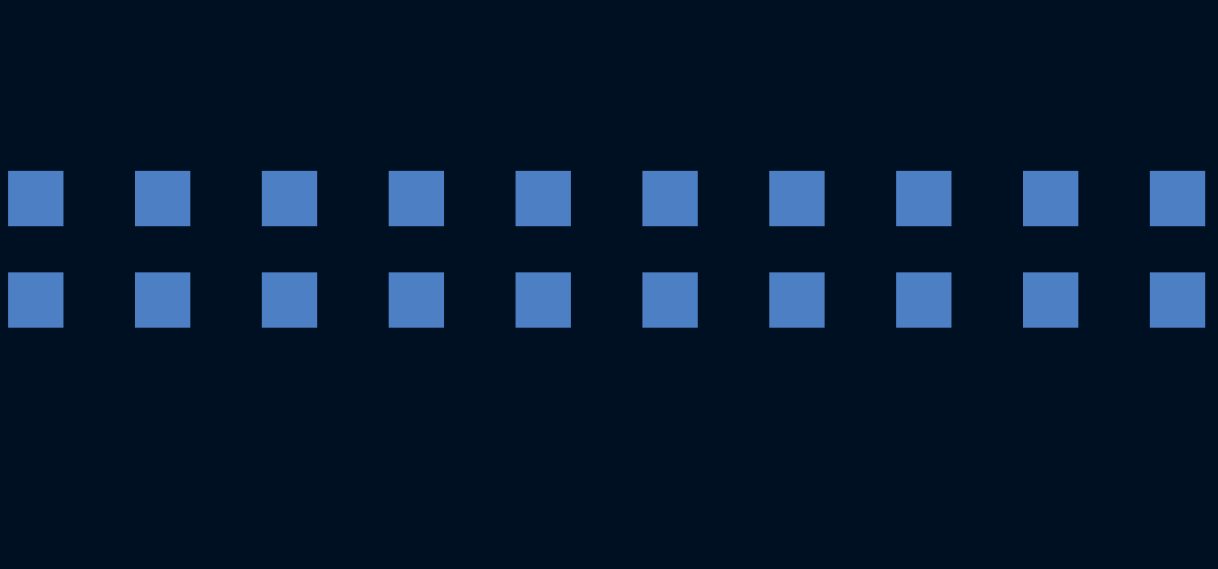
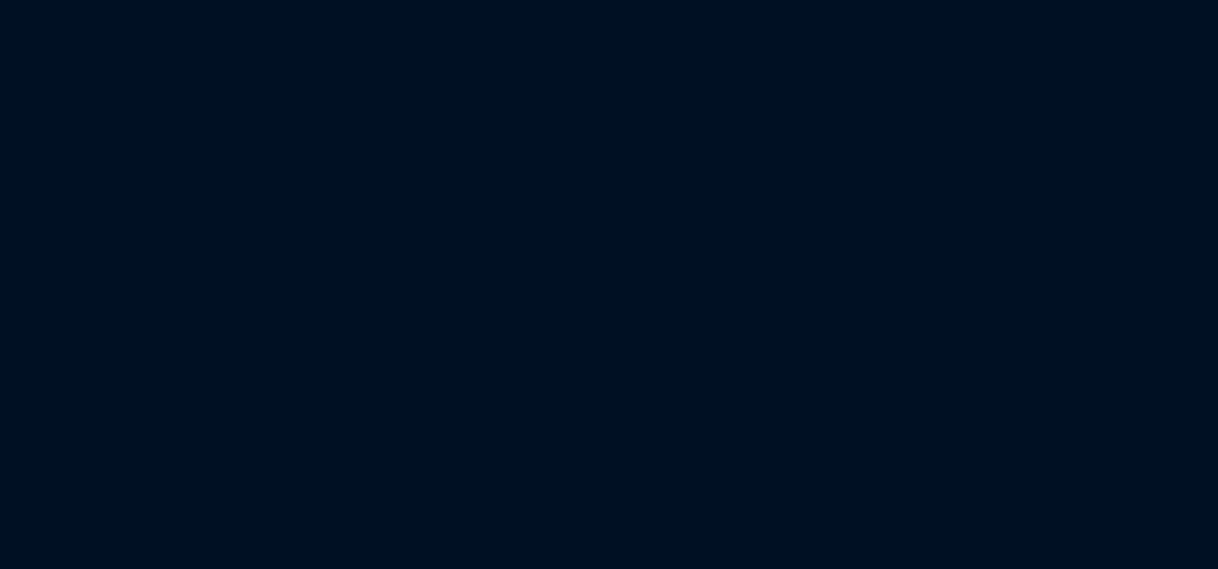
part: (35, 249) -> none
part: (162, 249) -> none
part: (289, 249) -> none
part: (416, 249) -> none
part: (543, 249) -> none
part: (670, 249) -> none
part: (796, 249) -> none
part: (923, 249) -> none
part: (1050, 249) -> none
part: (1177, 249) -> none

